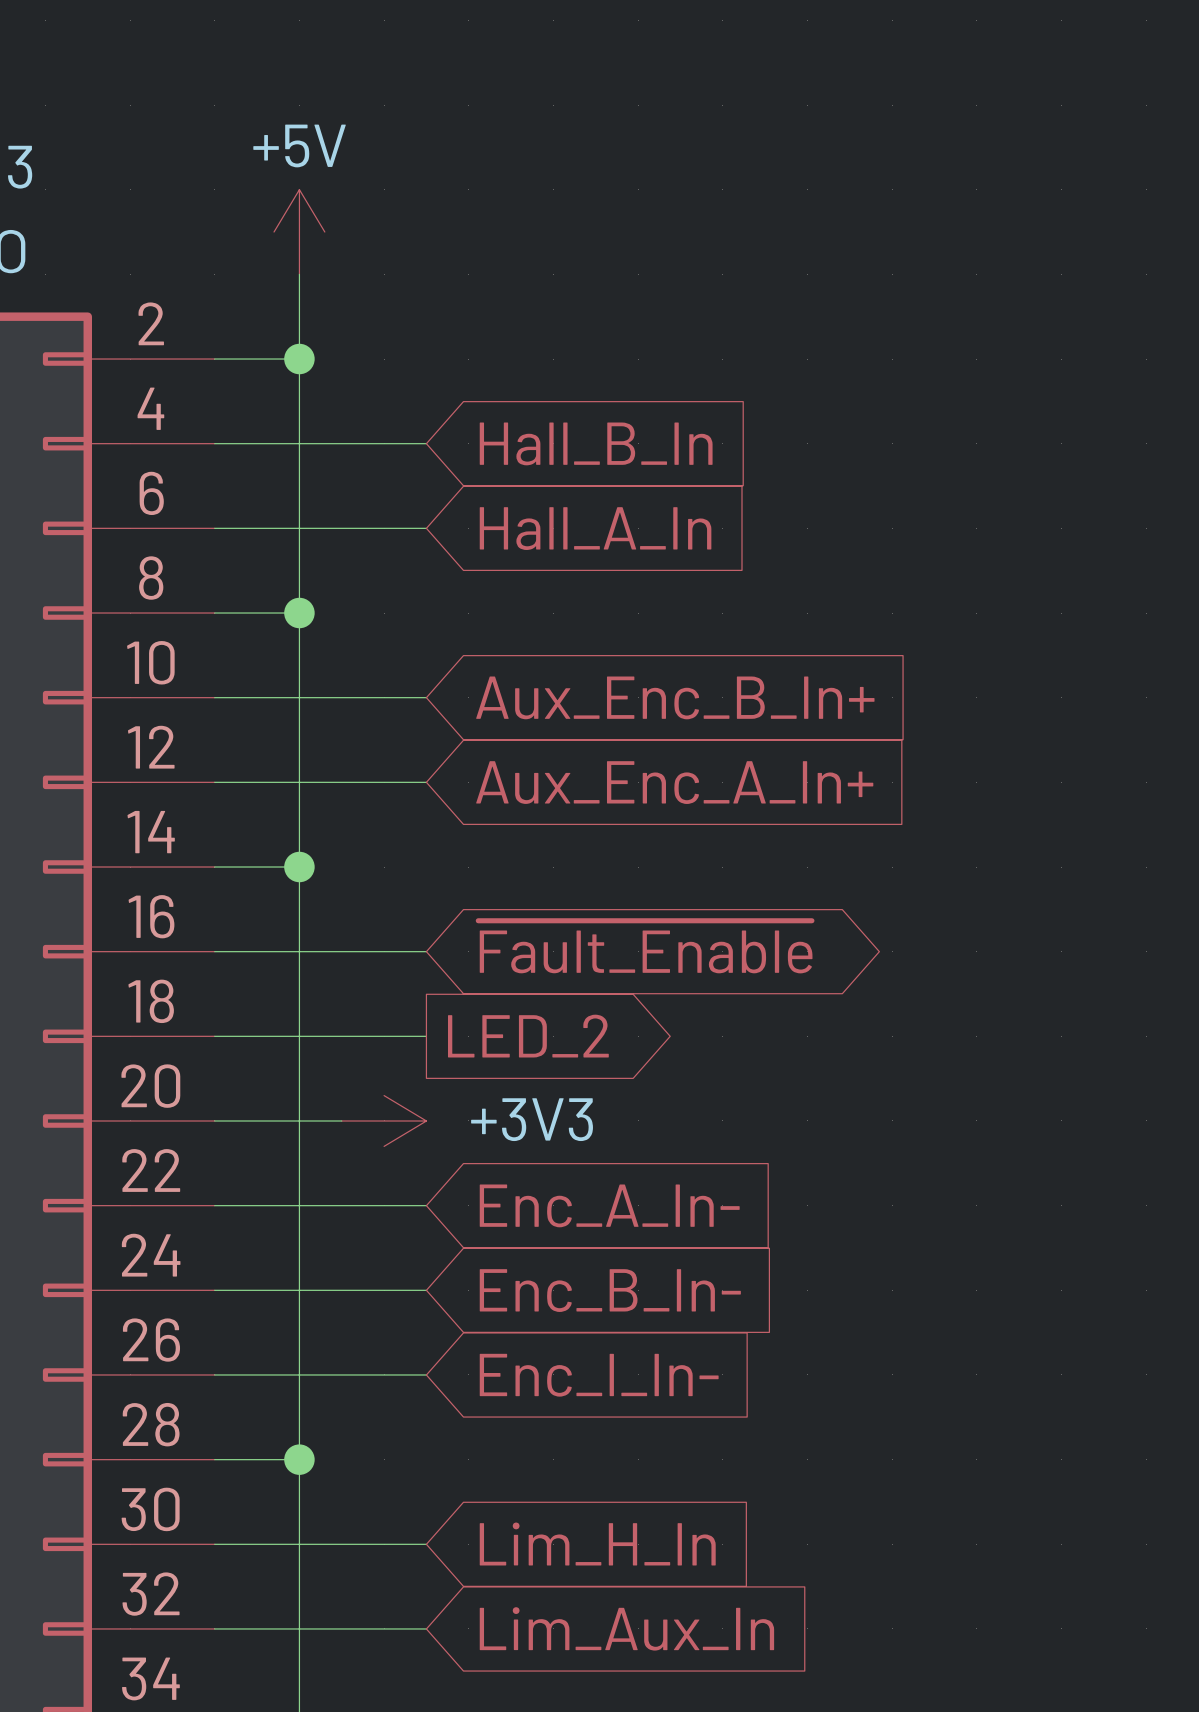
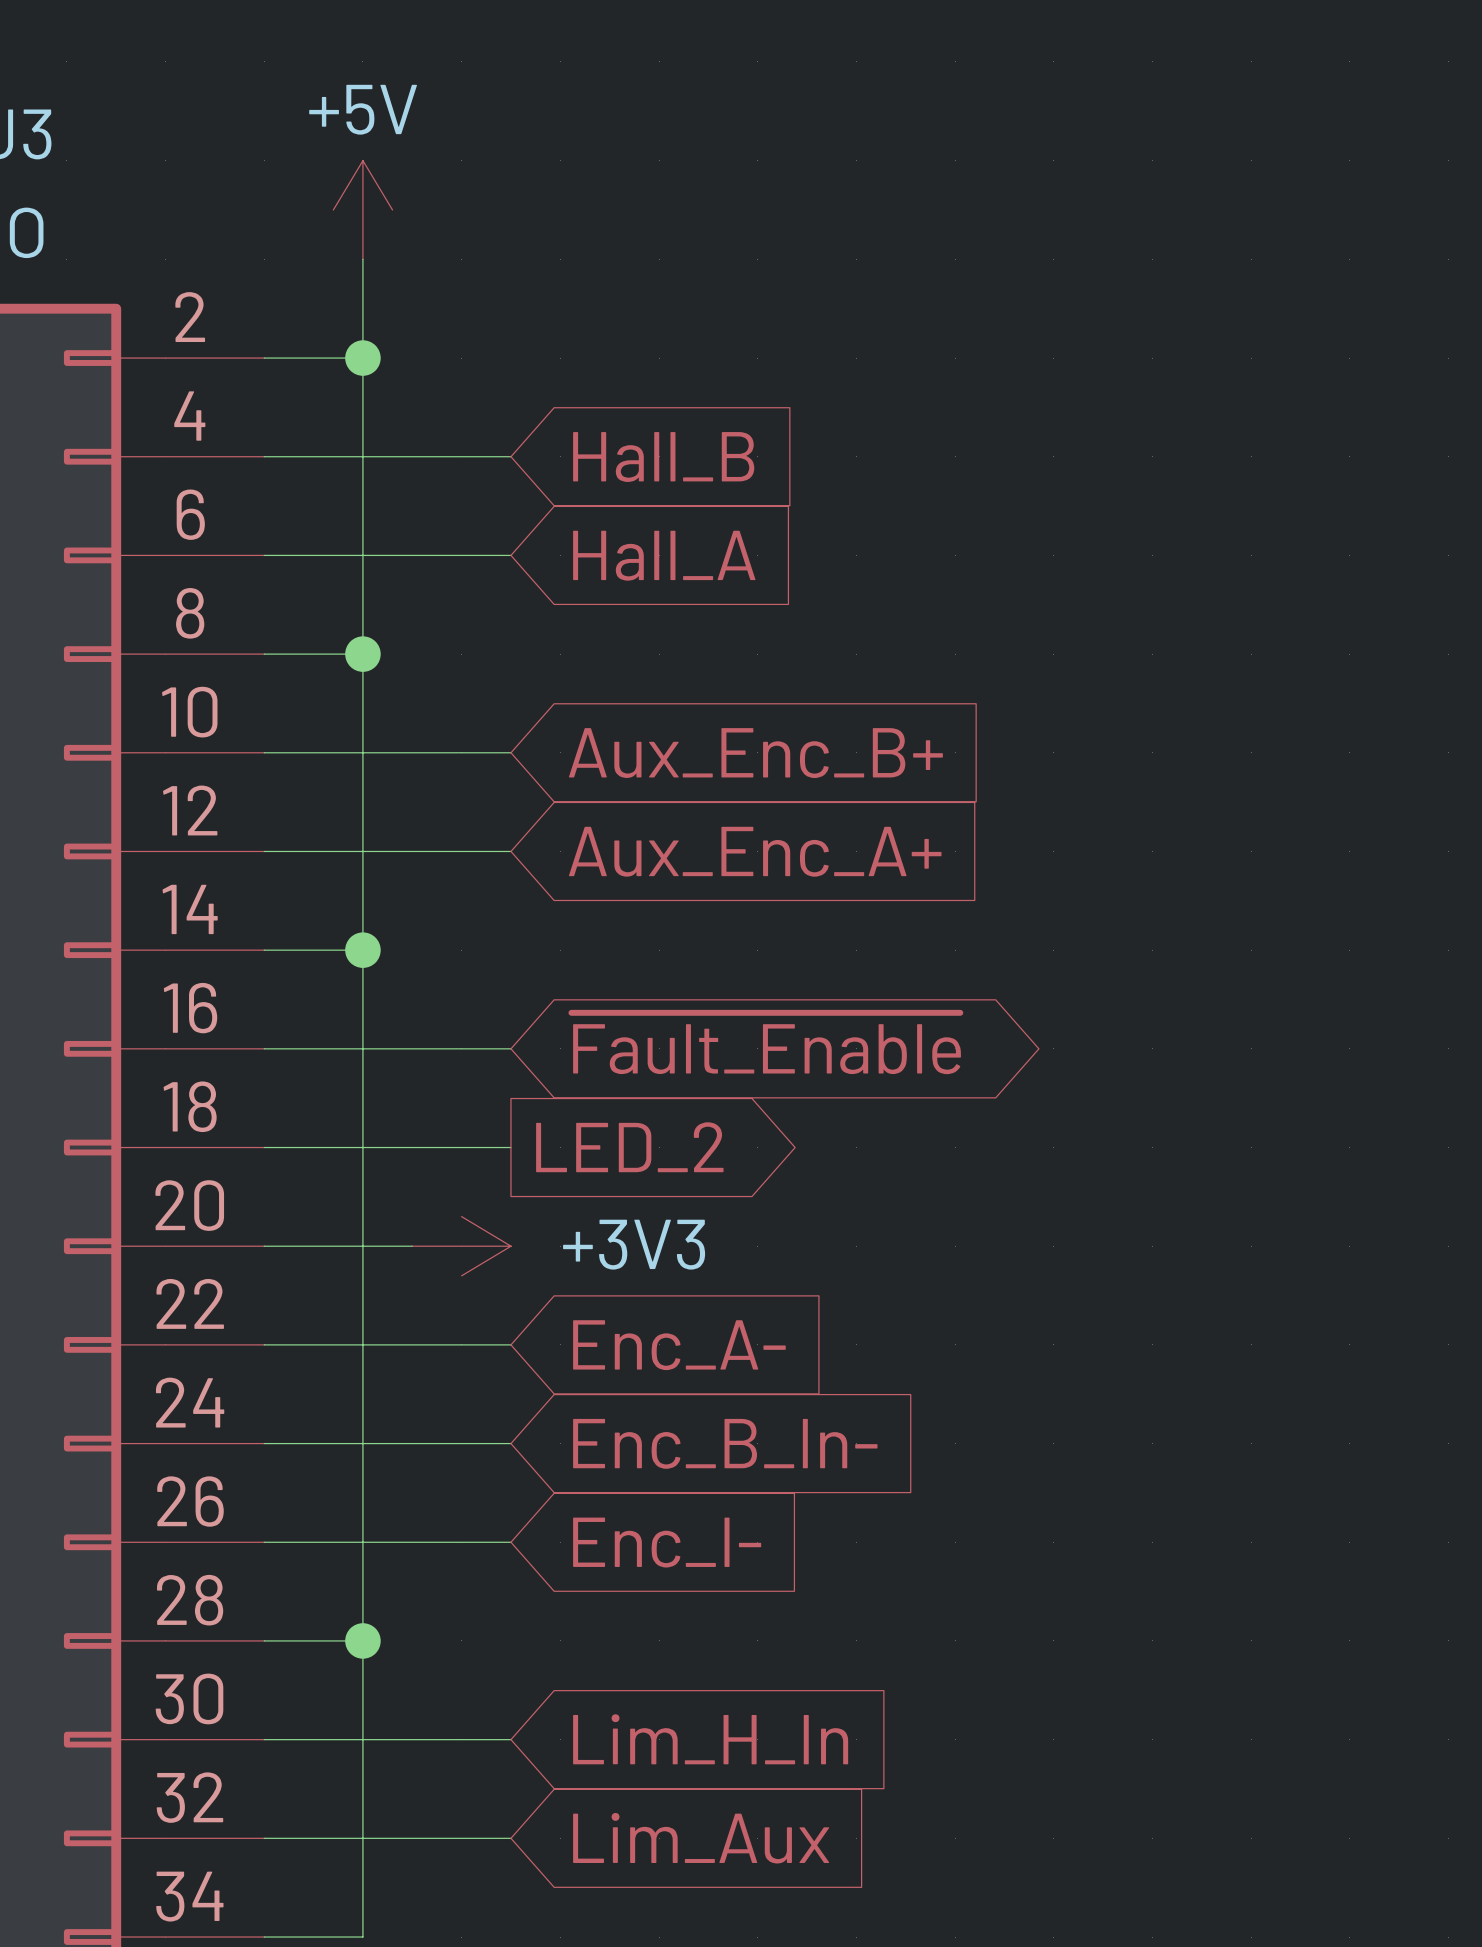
global label: Hall_B_In (596, 443) -> Hall_B (663, 457)
global label: Hall_A_In (595, 528) -> Hall_A (664, 555)
global label: Aux_Enc_B_In+ (675, 697) -> Aux_Enc_B+ (755, 753)
global label: Aux_Enc_A_In+ (674, 782) -> Aux_Enc_A+ (755, 851)
global label: Enc_A_In- (609, 1205) -> Enc_A- (679, 1345)
global label: Enc_I_In- (599, 1375) -> Enc_I- (667, 1542)
global label: Lim_Aux_In (626, 1628) -> Lim_Aux (701, 1838)

